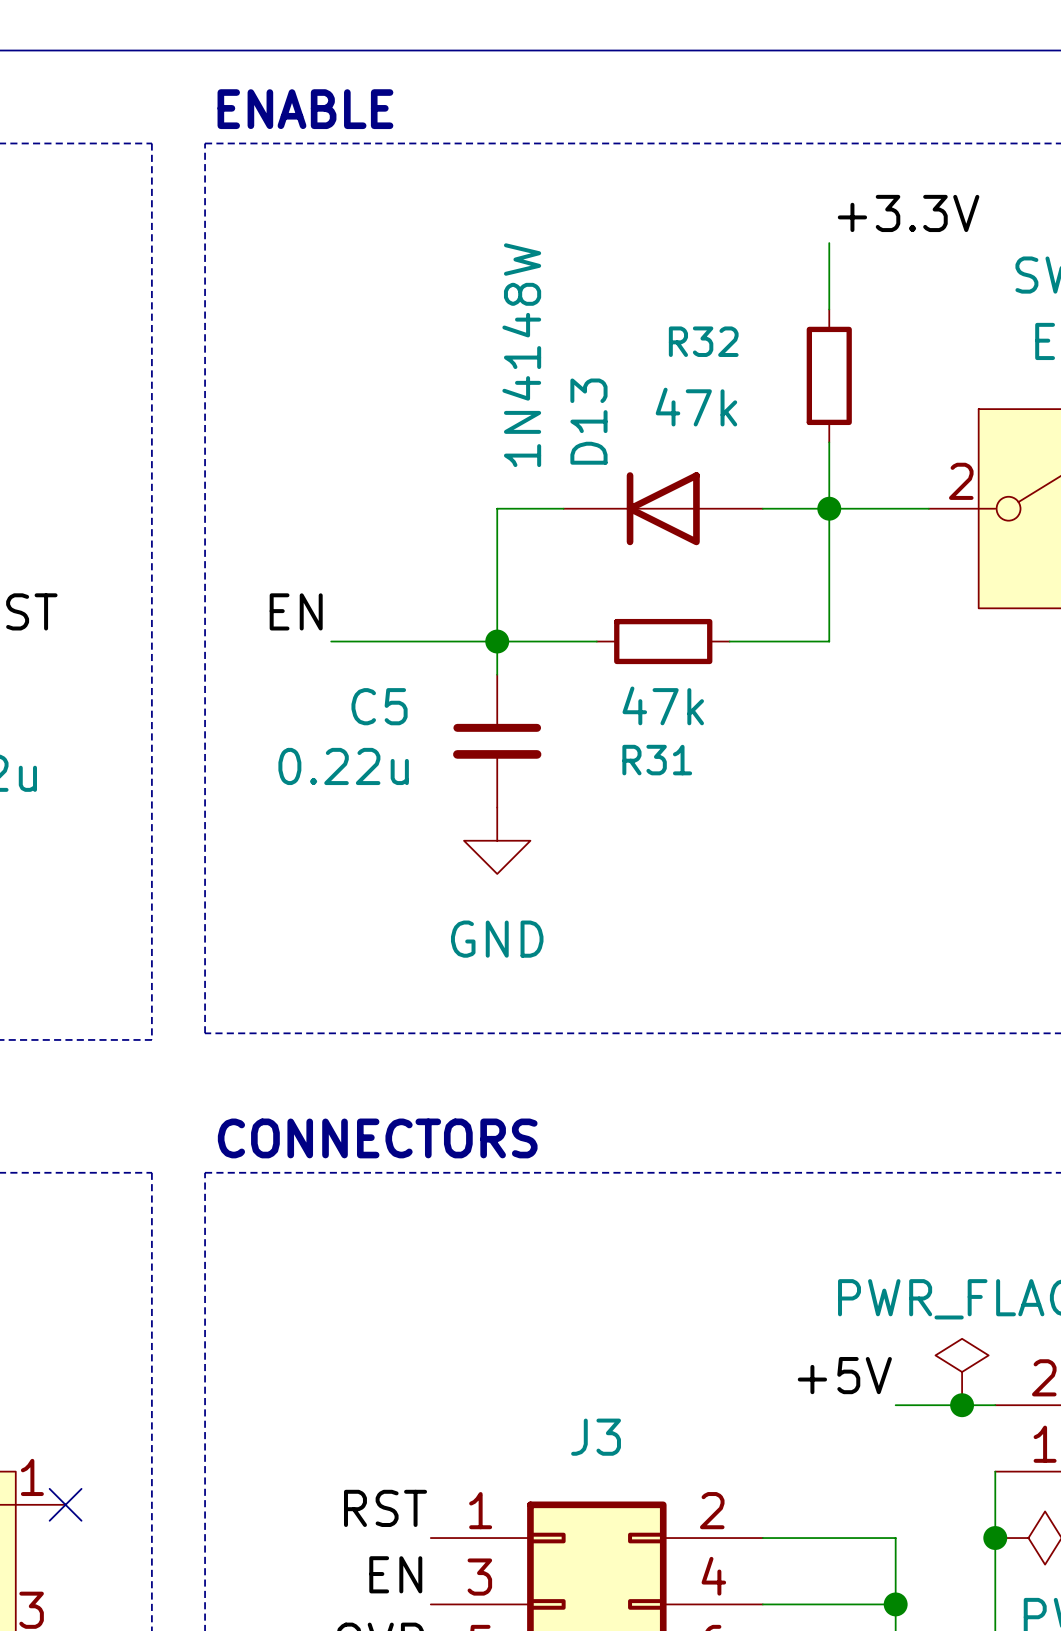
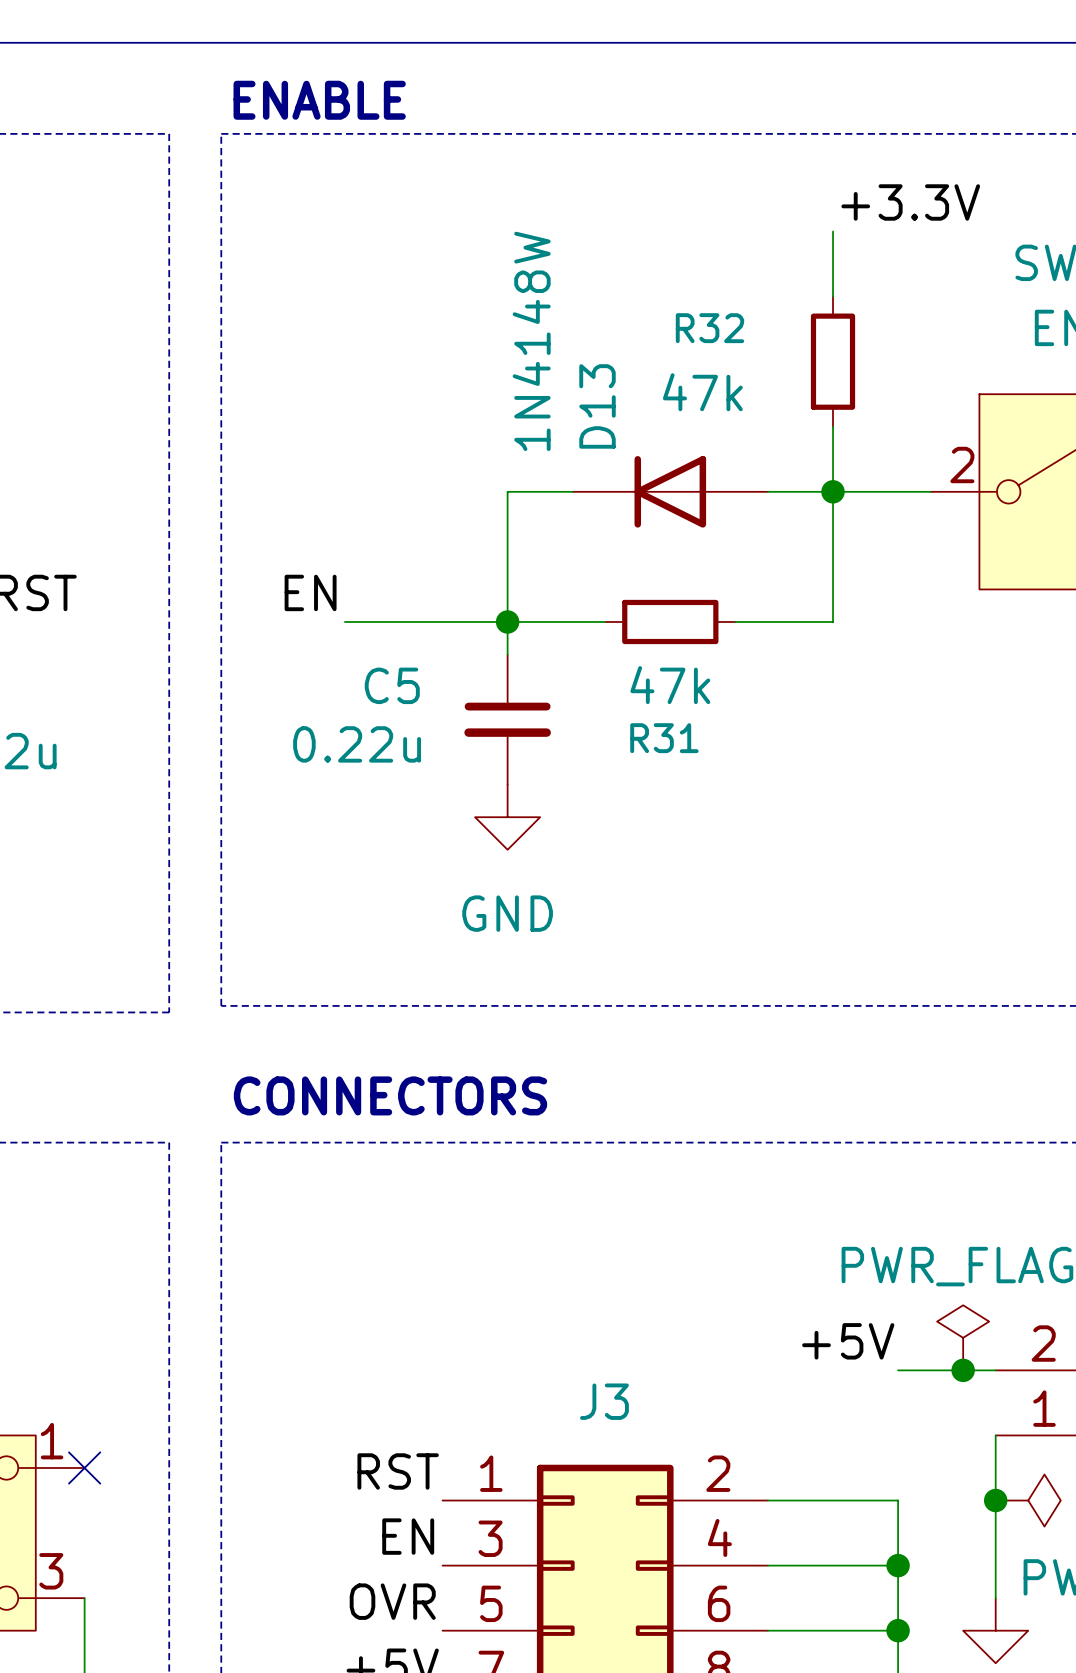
text position: CONNECTORS (377, 1138) -> CONNECTORS (390, 1095)

